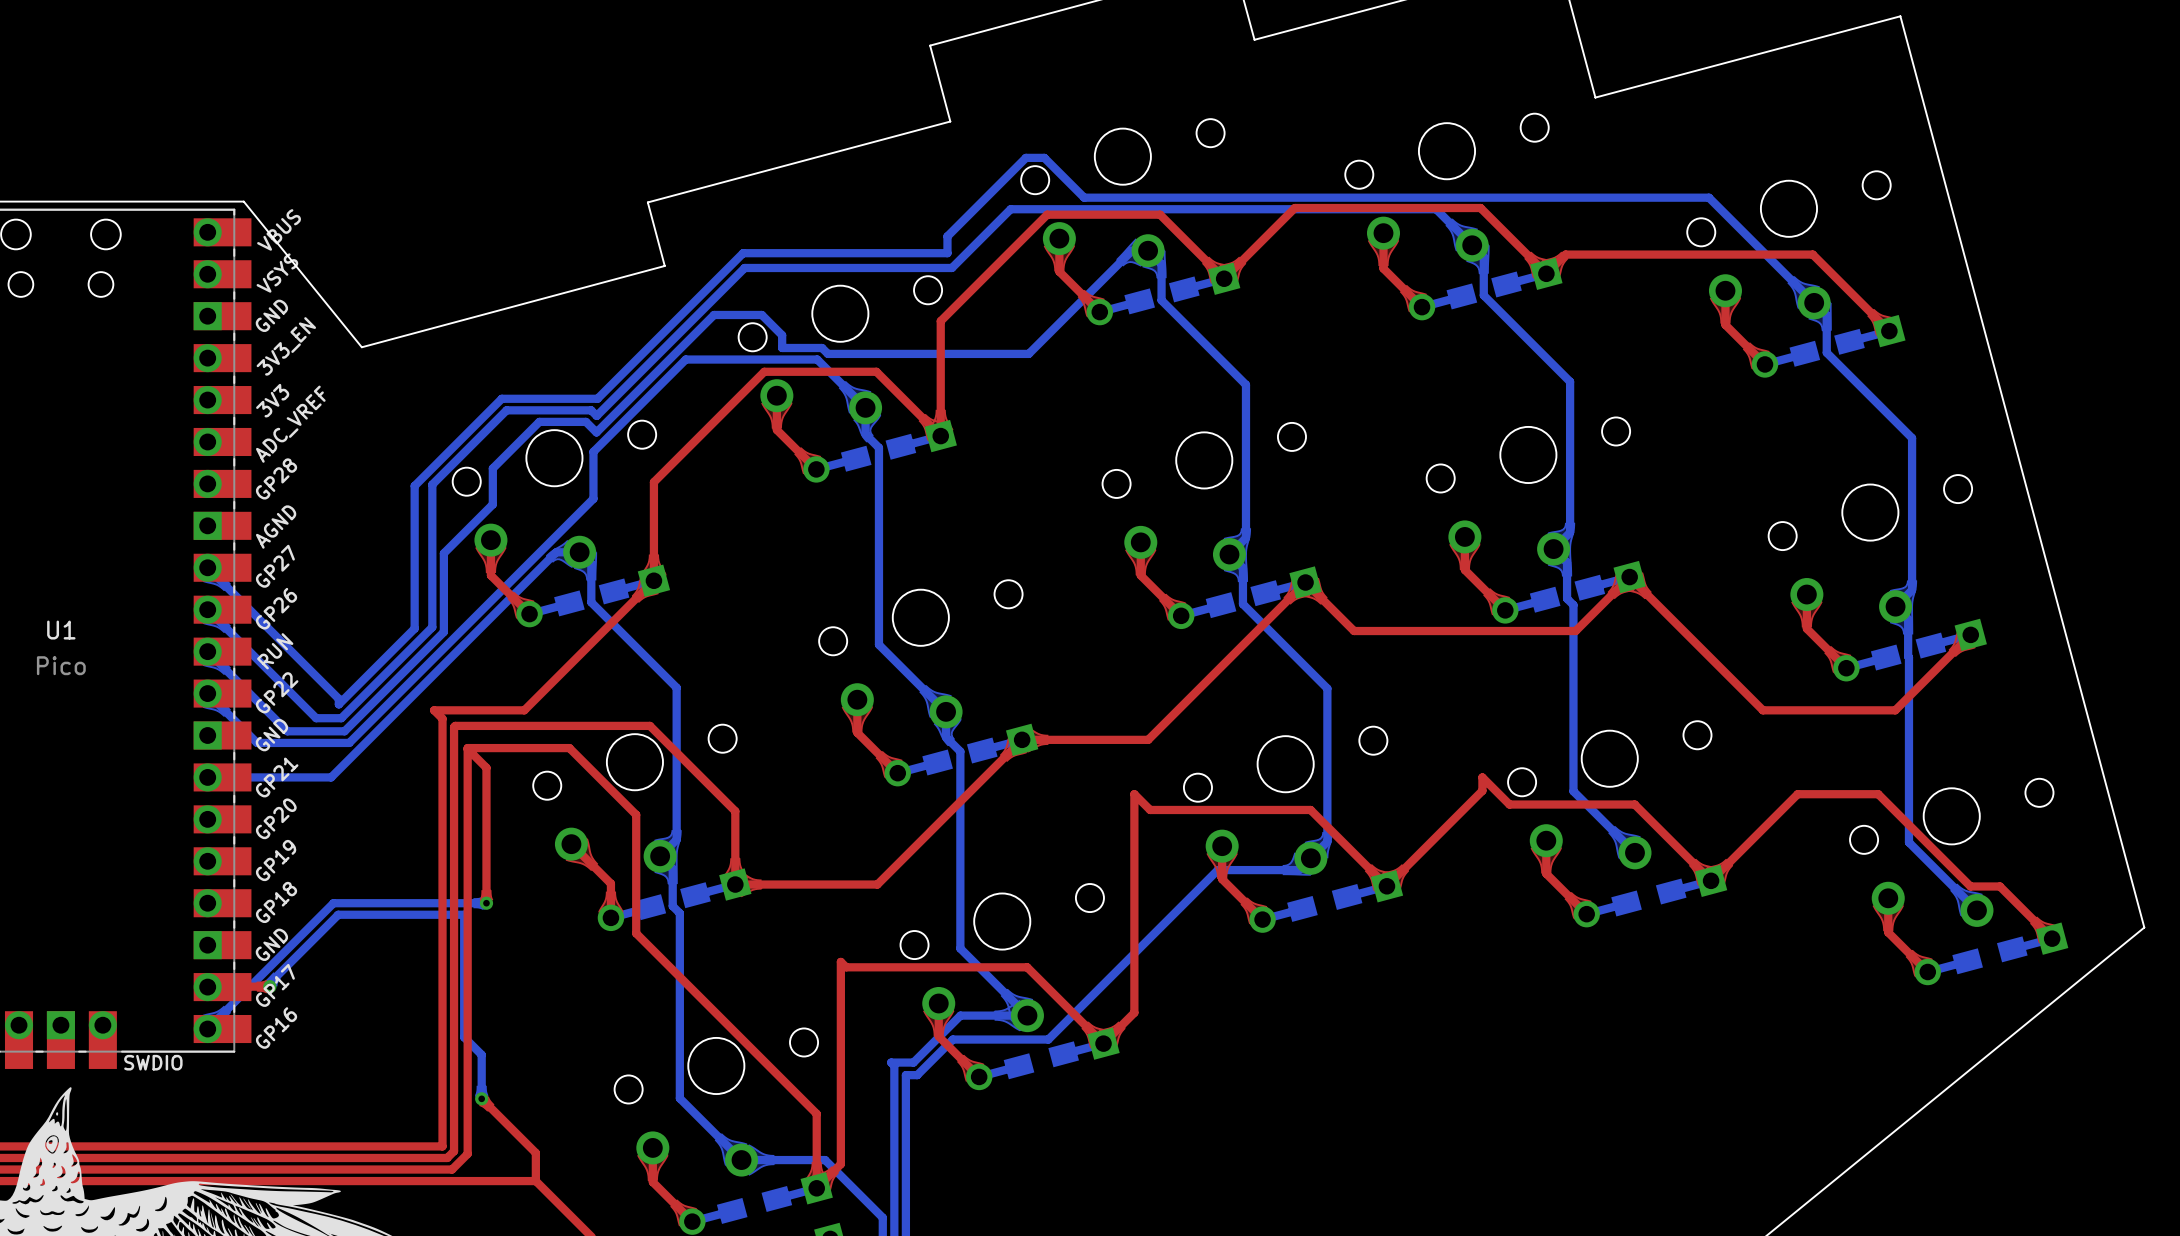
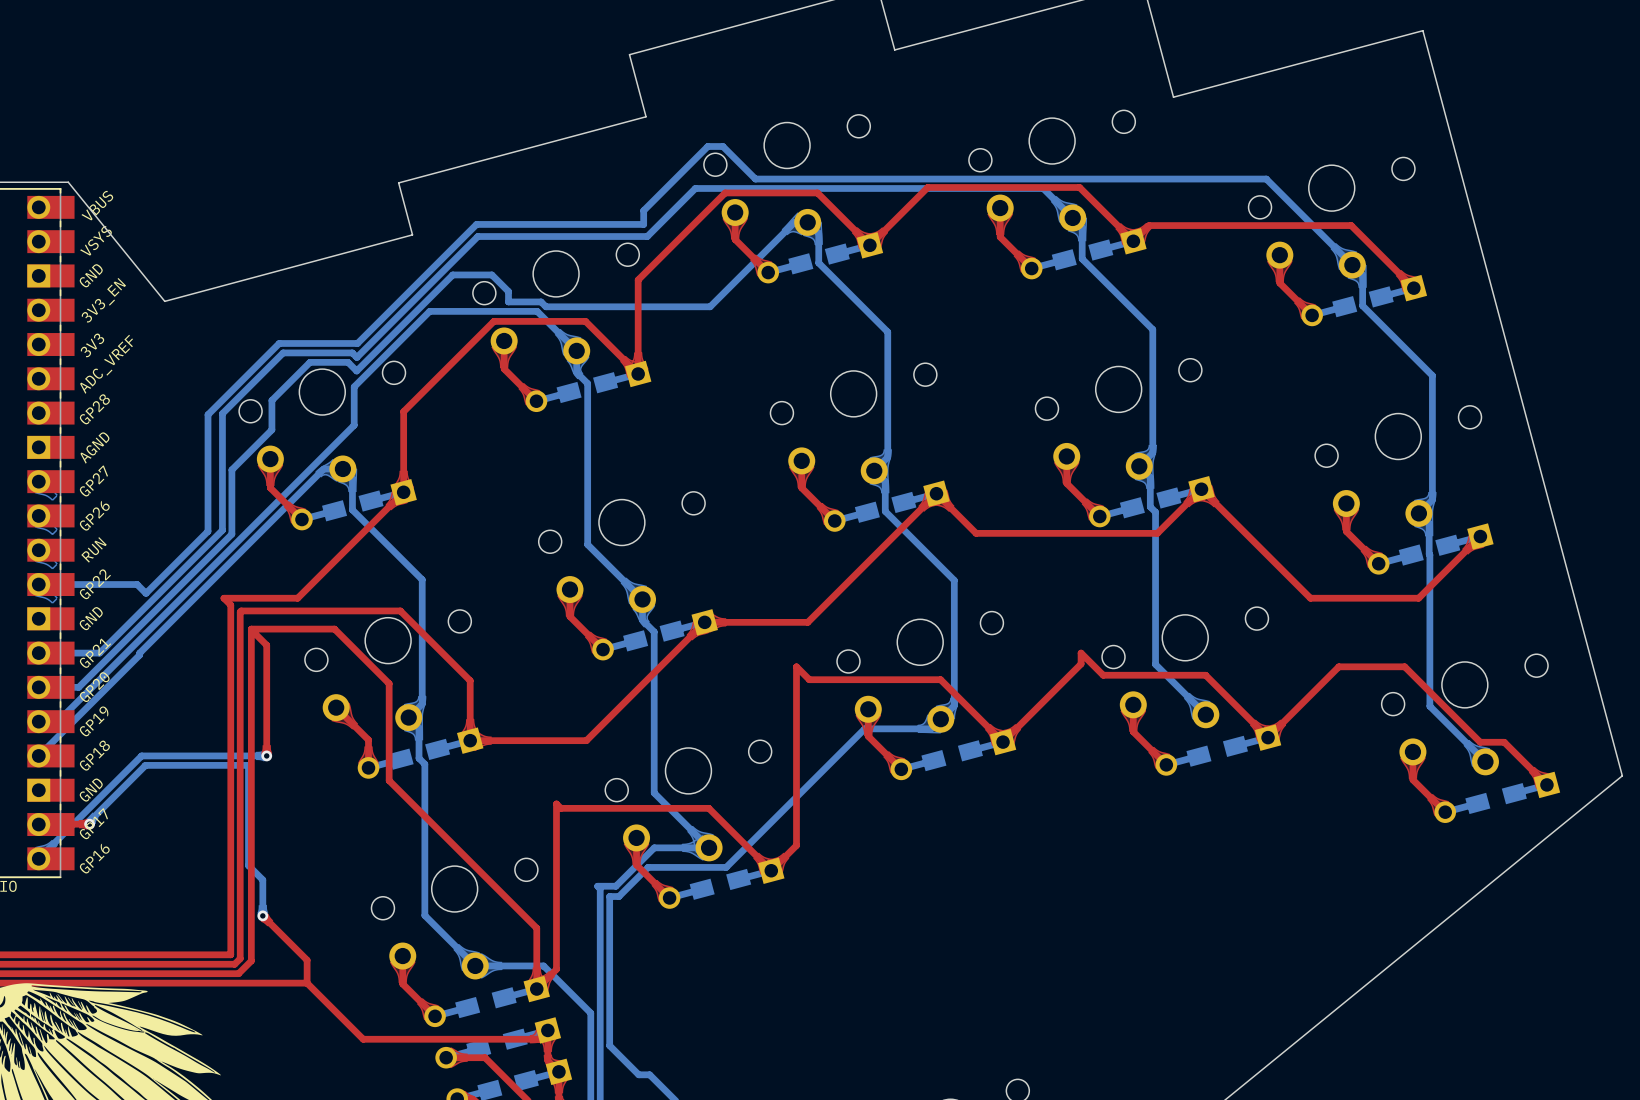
bottom track: (207, 567) (338, 698) (338, 704) -> none
bottom track: (207, 609) (316, 718) (341, 718) -> none
bottom track: (207, 651) (287, 731) (344, 731) -> (38, 687) (78, 687) (150, 615)
bottom track: (207, 693) (257, 742) (349, 742) -> (38, 584) (137, 584) (146, 593)
bottom track: none -> (154, 624) (57, 721) (38, 721)
bottom track: (282, 777) (331, 777) -> (99, 653) (148, 604)
bottom track: none -> (139, 653) (38, 755)

